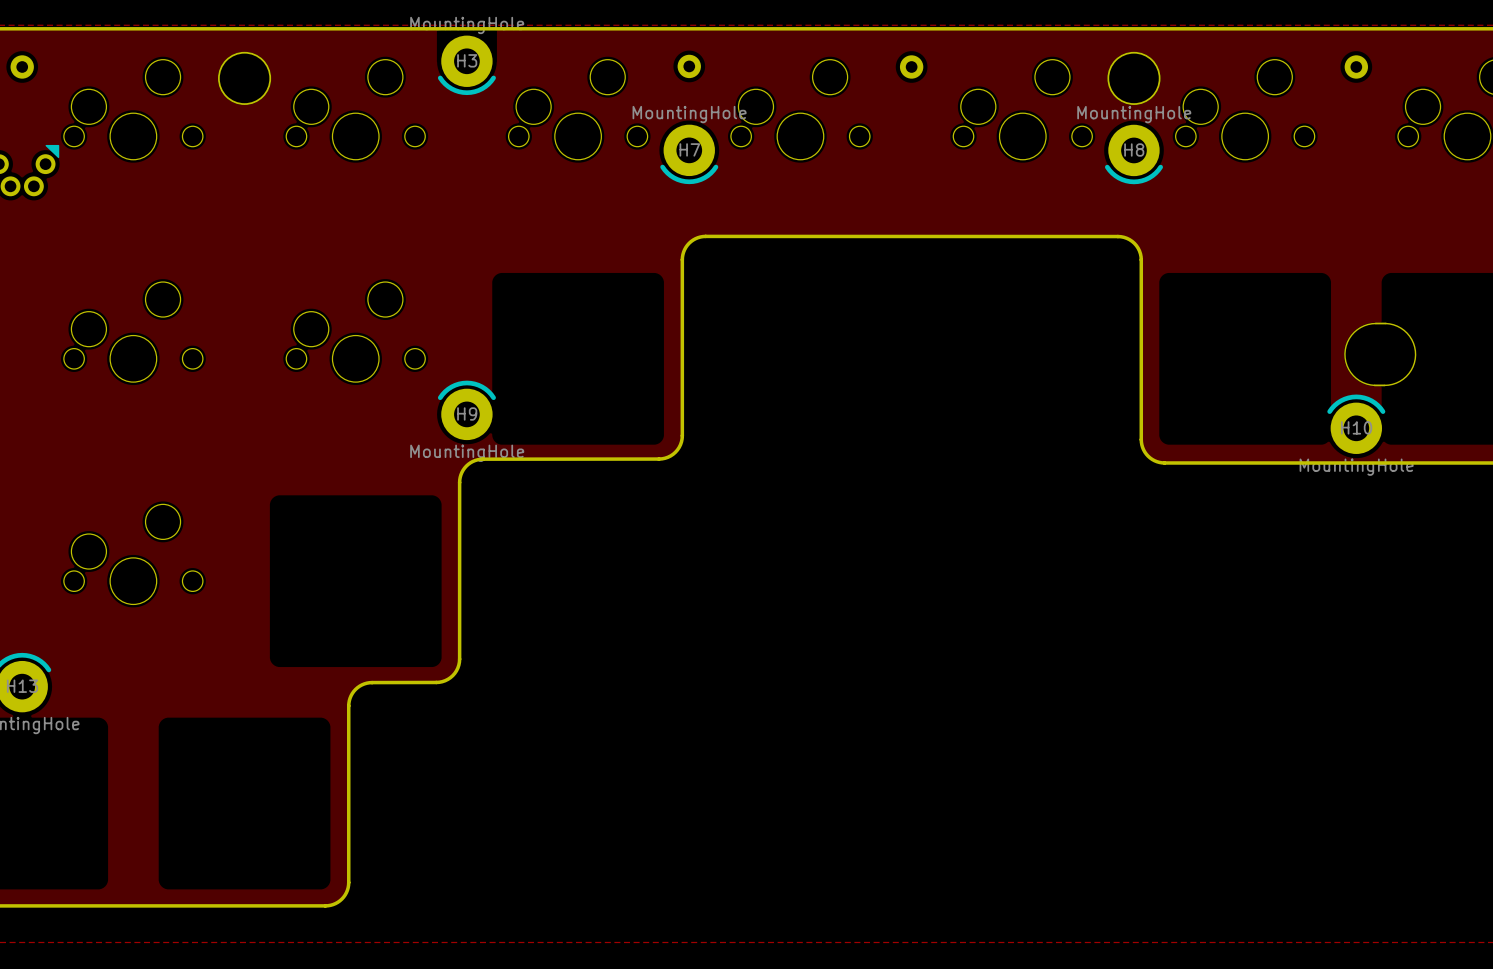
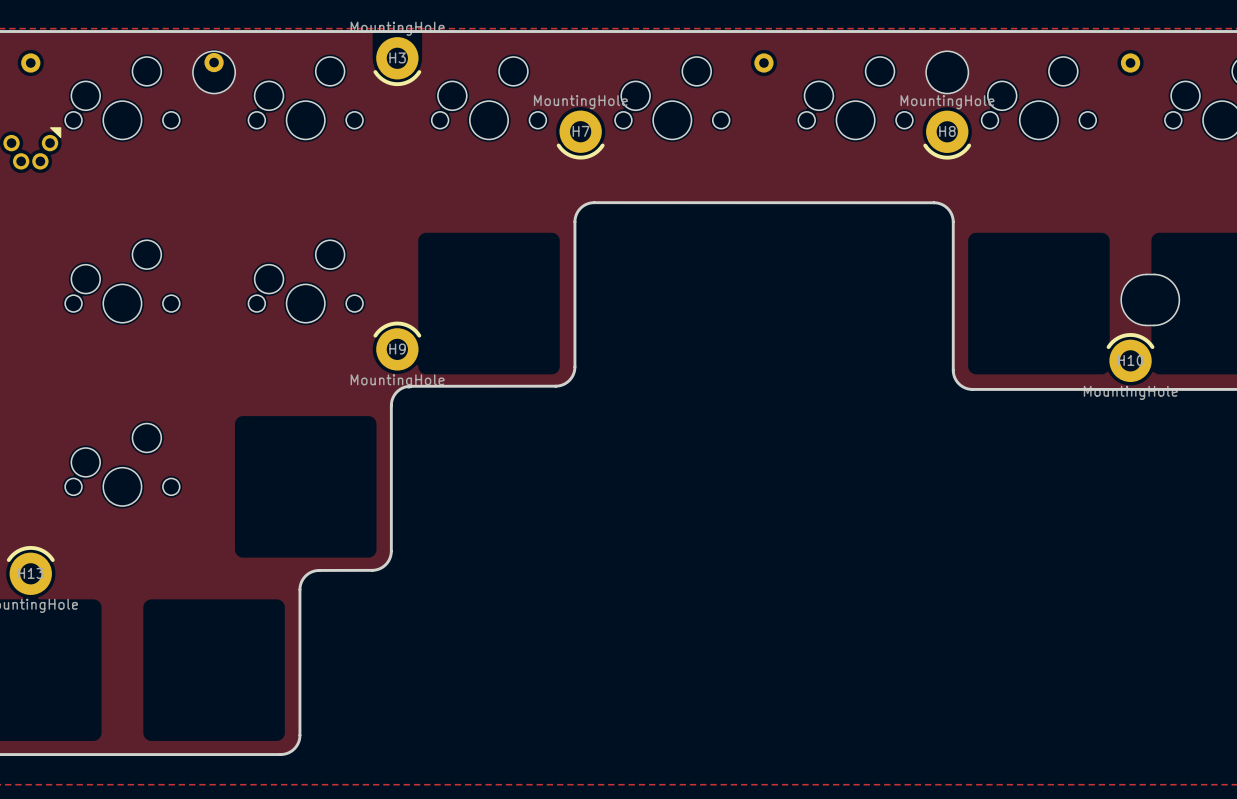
part: none -> (214, 62)
part: (689, 66) -> none

